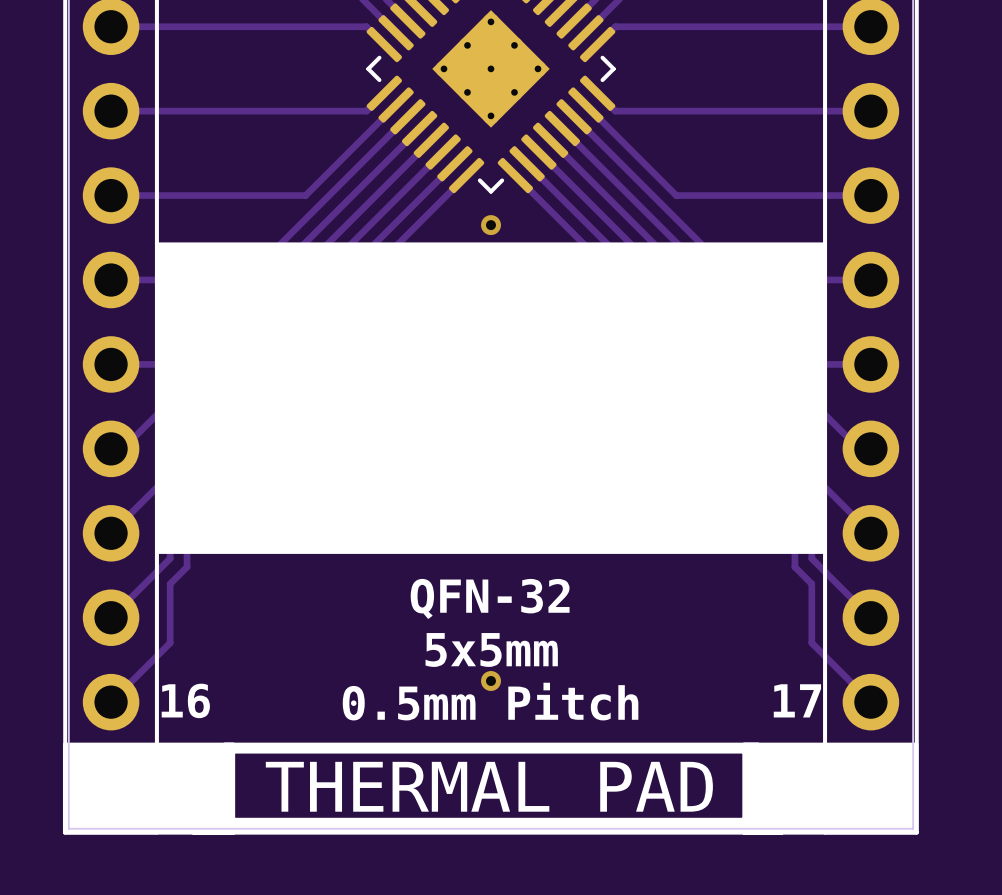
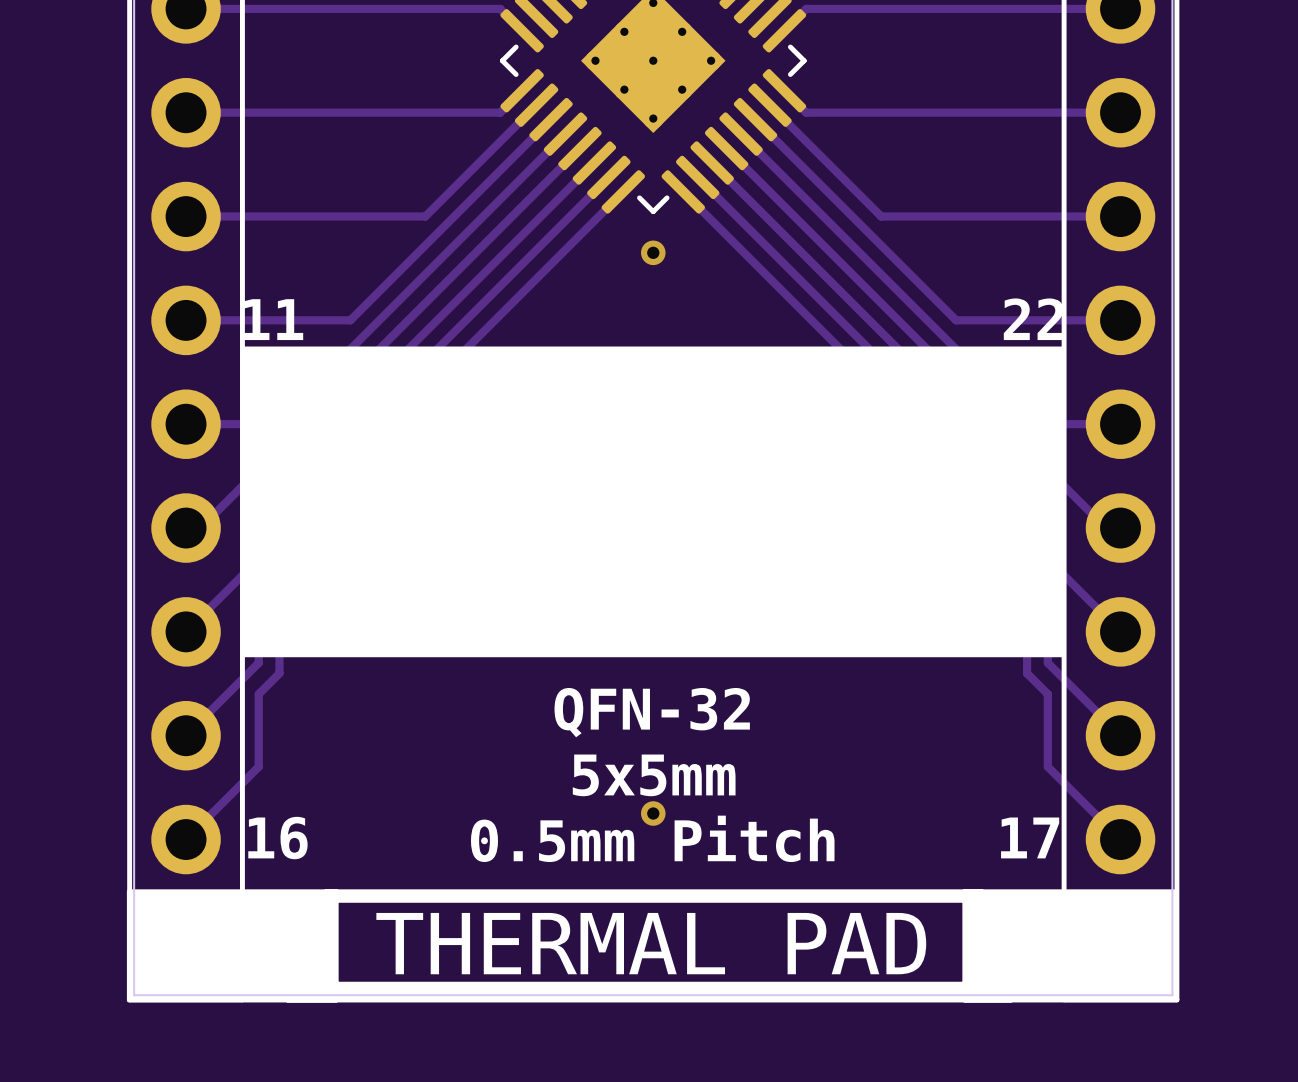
drawing shape: [155, 242, 827, 554] -> [241, 346, 1066, 658]
text: none -> 11 (273, 319)
text: none -> 22 (1033, 319)

